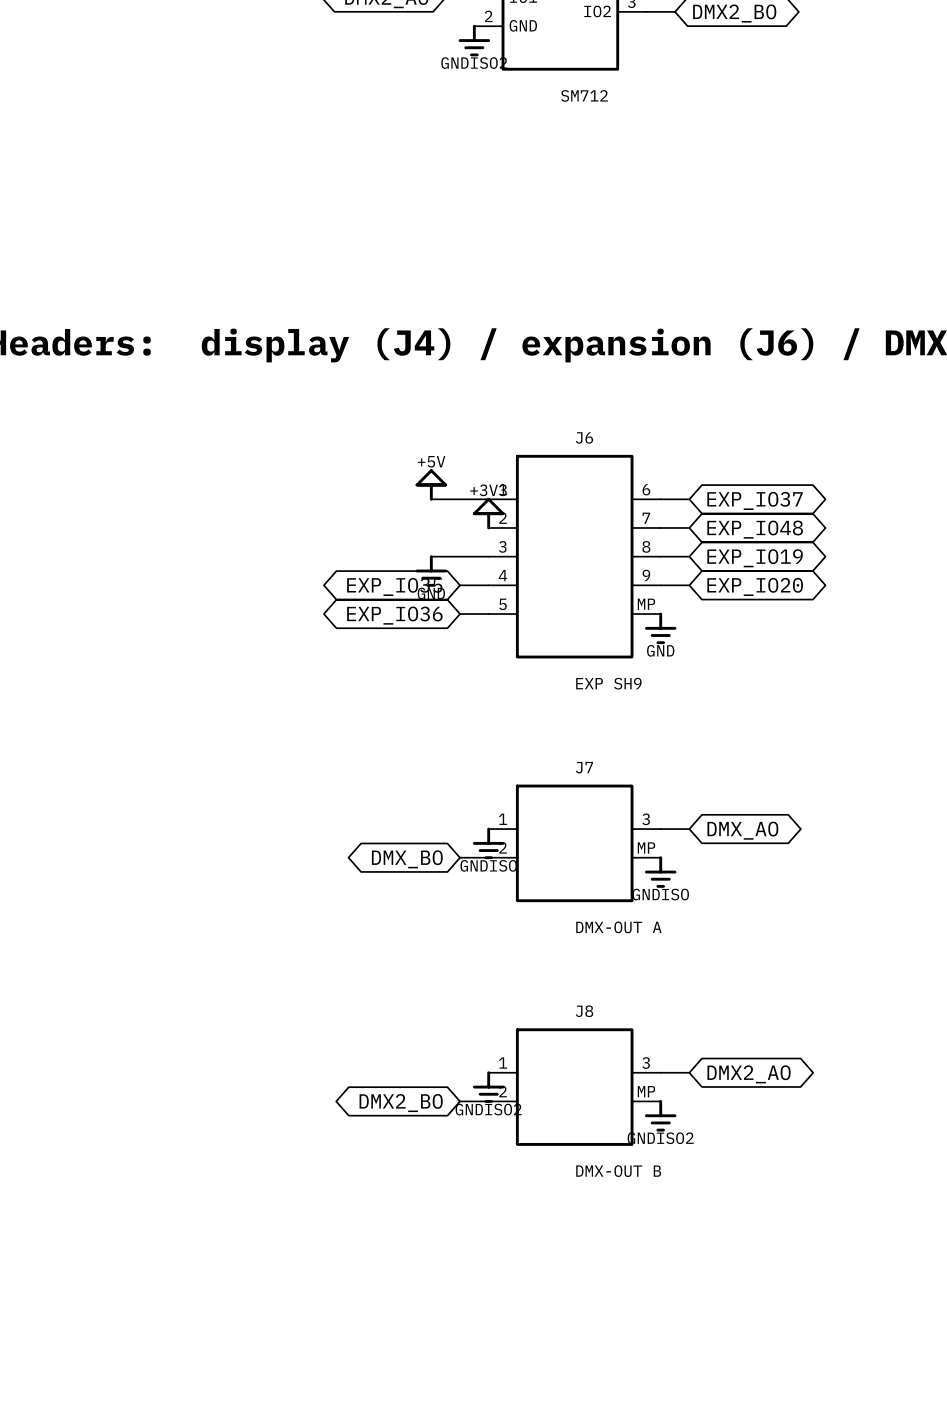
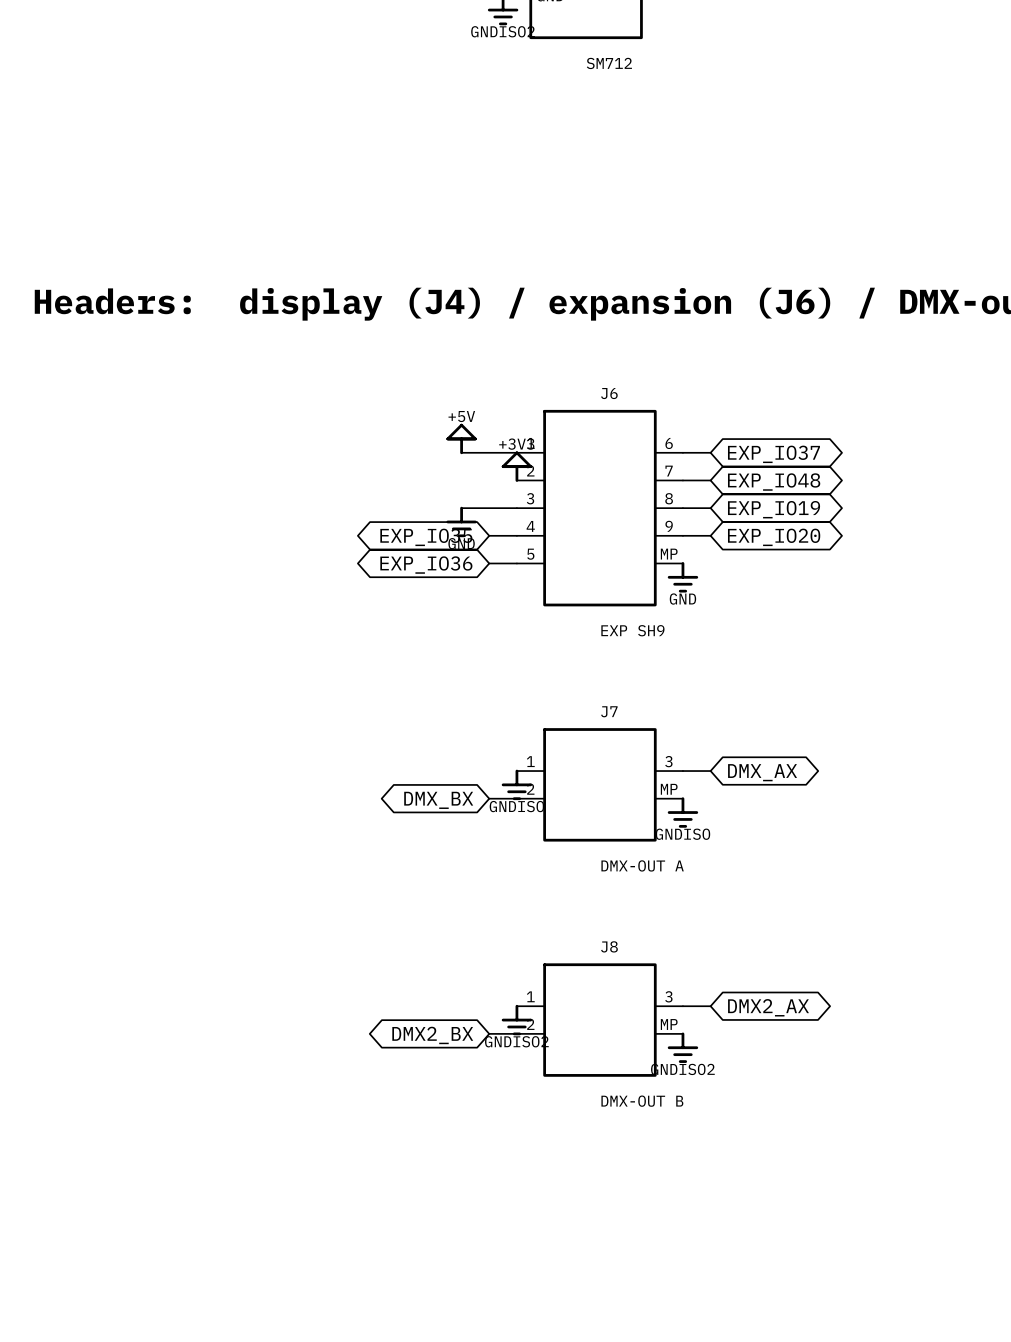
global label: DMX_AO (742, 830) -> DMX_AX (762, 772)
global label: DMX_BO (407, 859) -> DMX_BX (438, 800)
global label: DMX2_AO (749, 1074) -> DMX2_AX (768, 1007)
global label: DMX2_BO (401, 1103) -> DMX2_BX (432, 1035)

